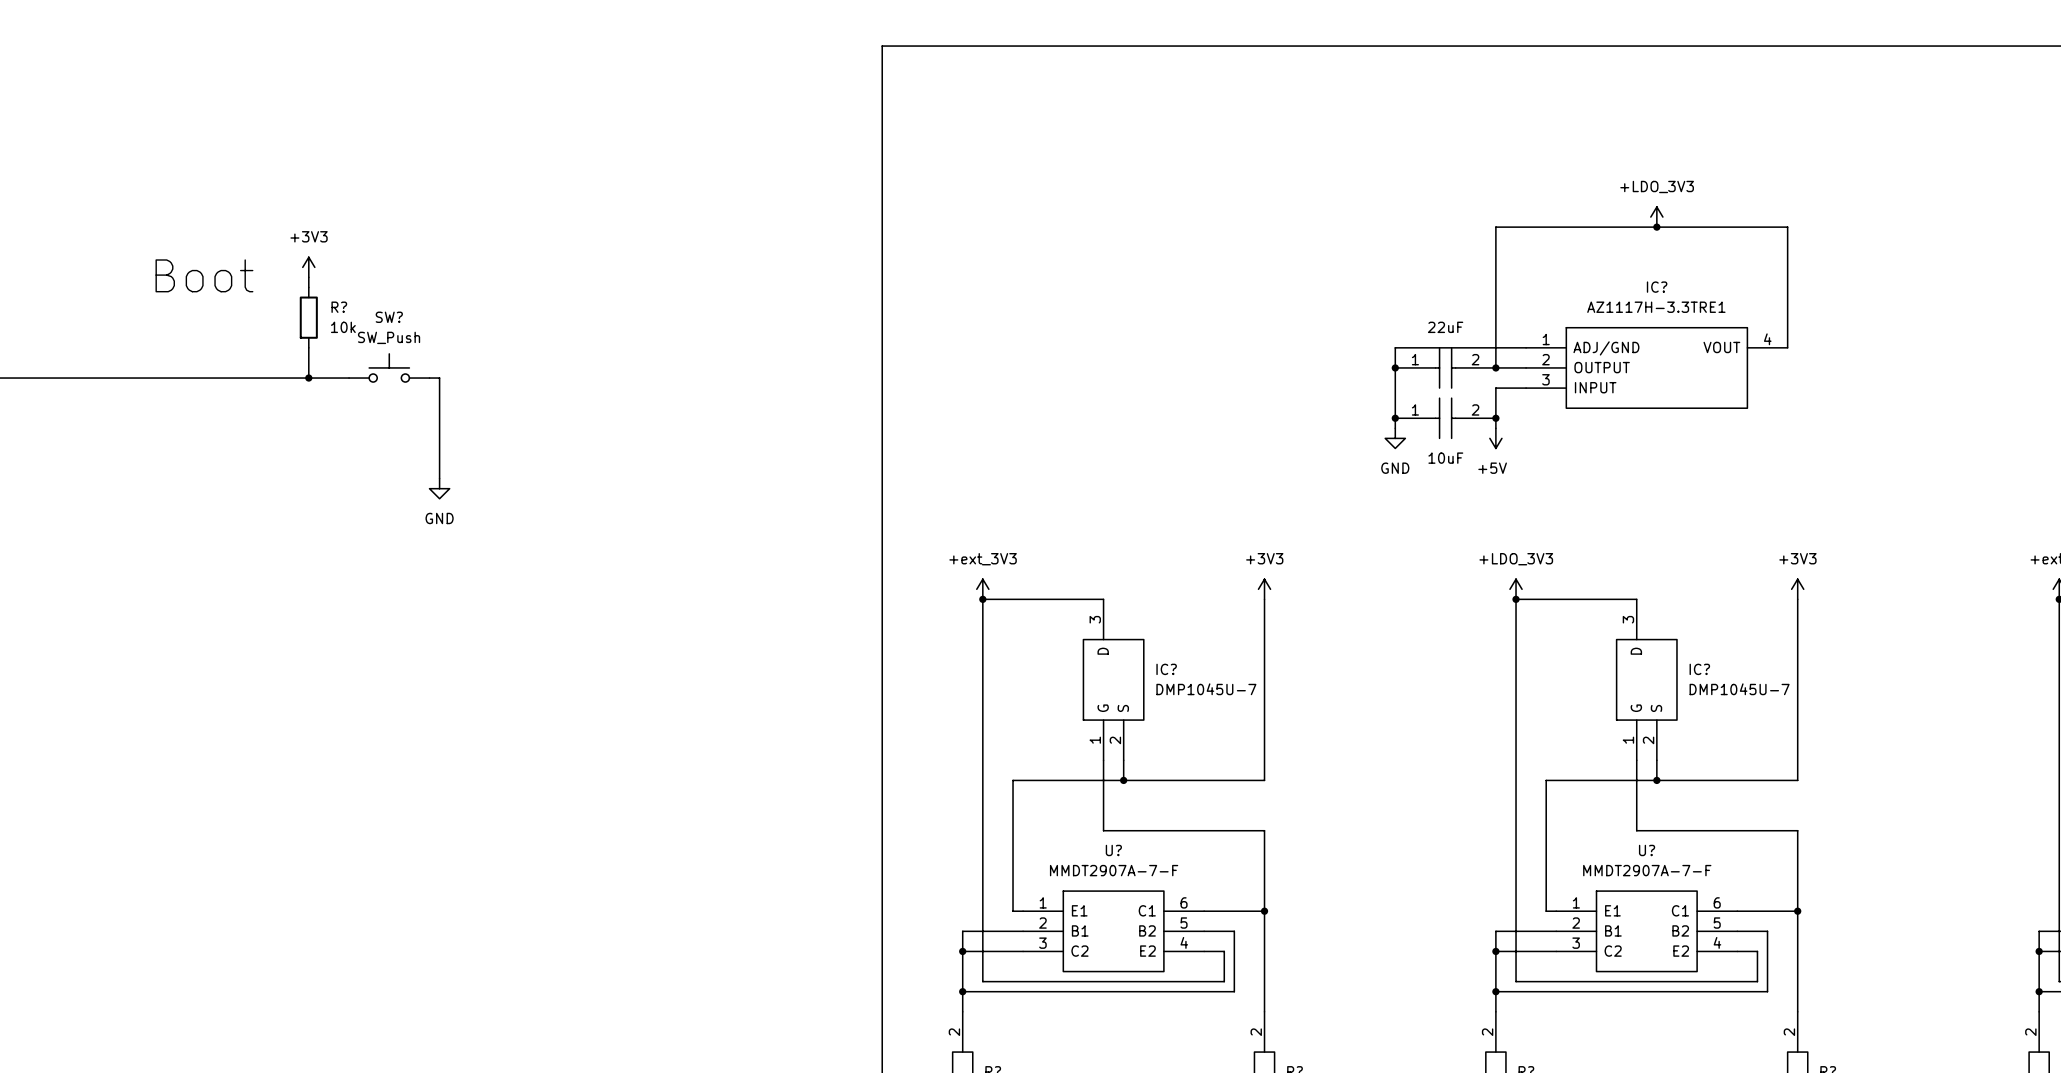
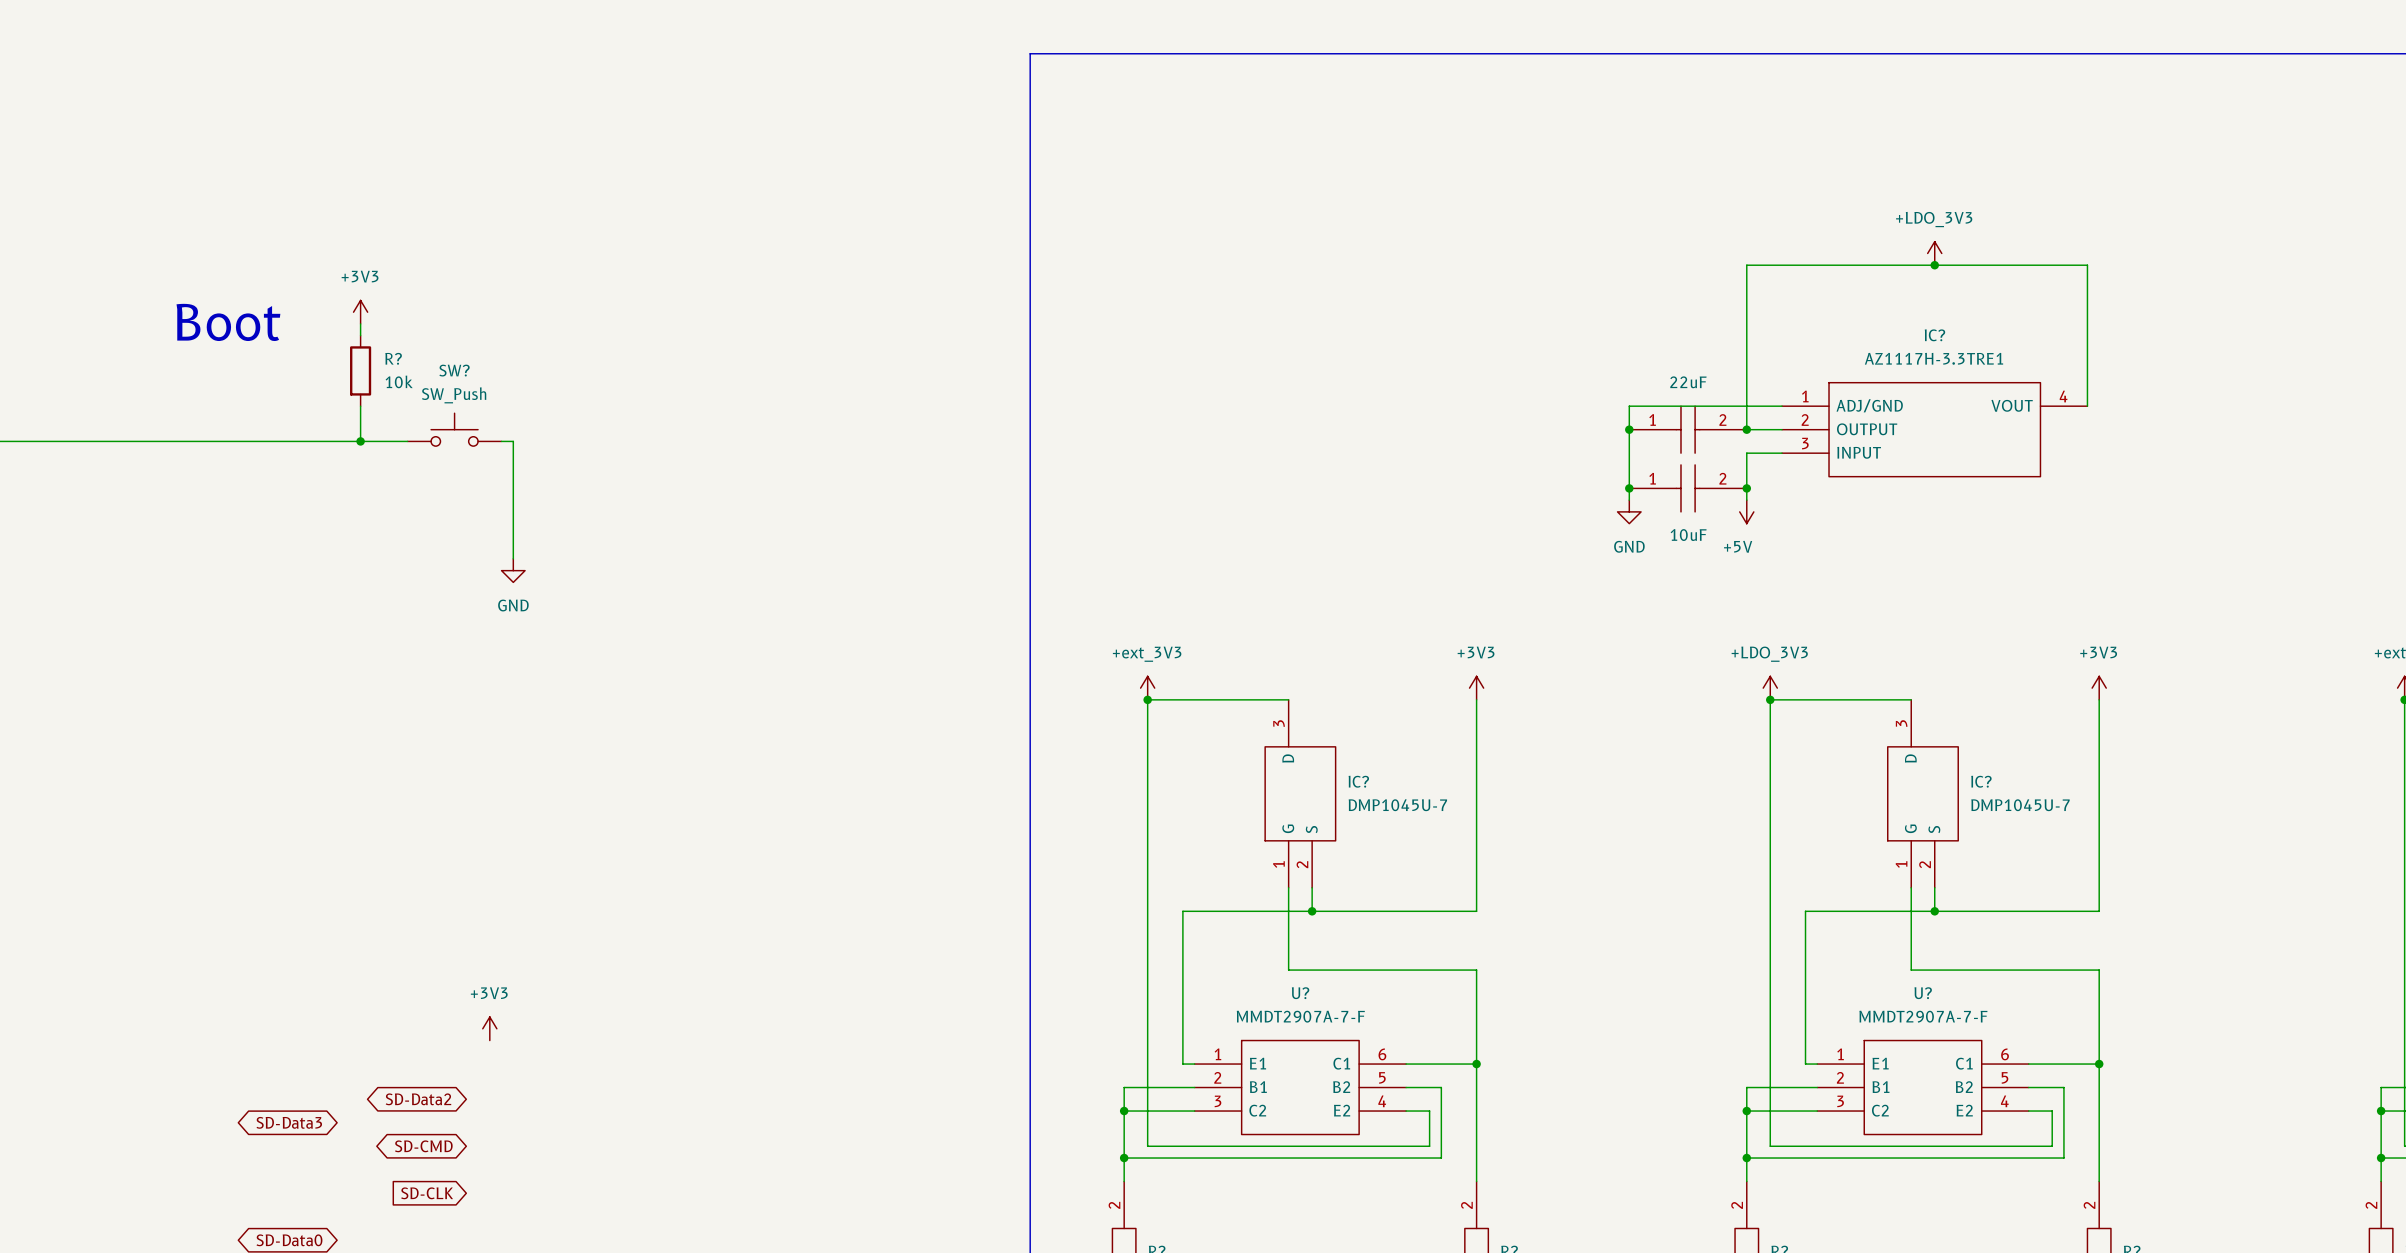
power symbol: none -> +3V3 (489, 1028)
global label: none -> SD-Data2 (418, 1099)
global label: none -> SD-Data3 (289, 1122)
global label: none -> SD-CMD (423, 1146)
global label: none -> SD-CLK (427, 1193)
global label: none -> SD-Data0 (289, 1240)

